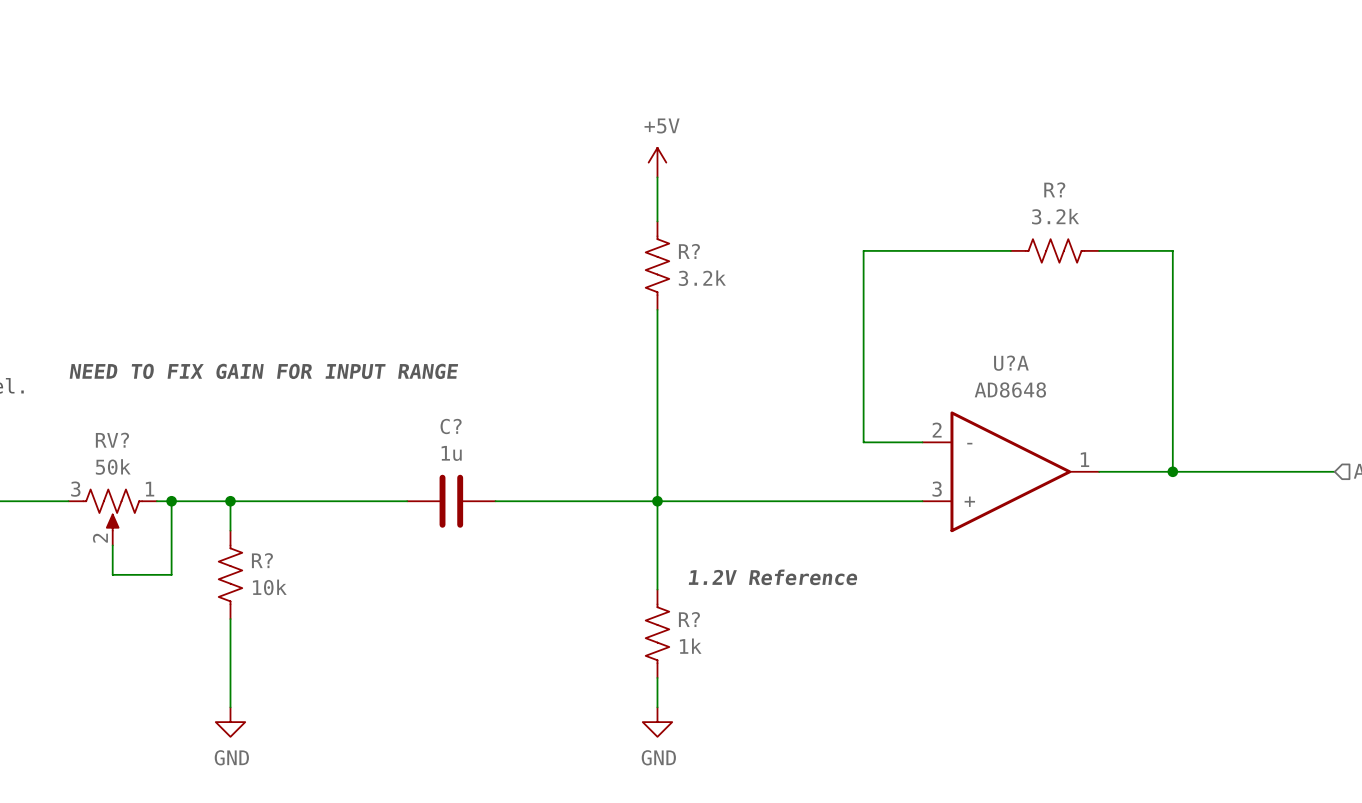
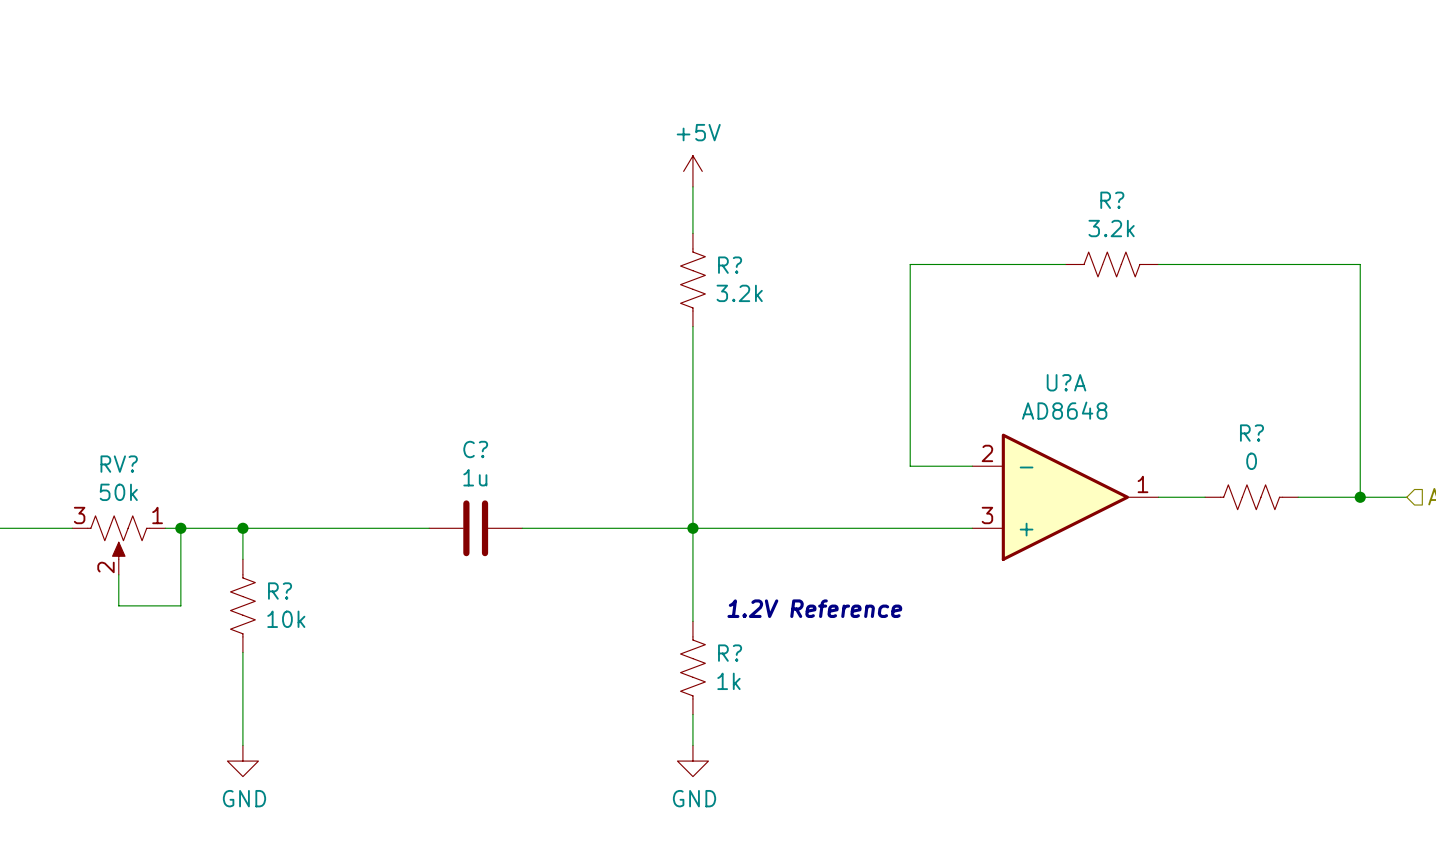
wire: (1172, 250) (1172, 471) -> (1236, 264) (1360, 264) (1360, 497)
text: NEED TO FIX GAIN FOR INPUT RANGE (263, 371) -> none
junction: (1172, 471) -> none
R?: none -> 0 (1251, 497)
junction: none -> (1360, 497)

